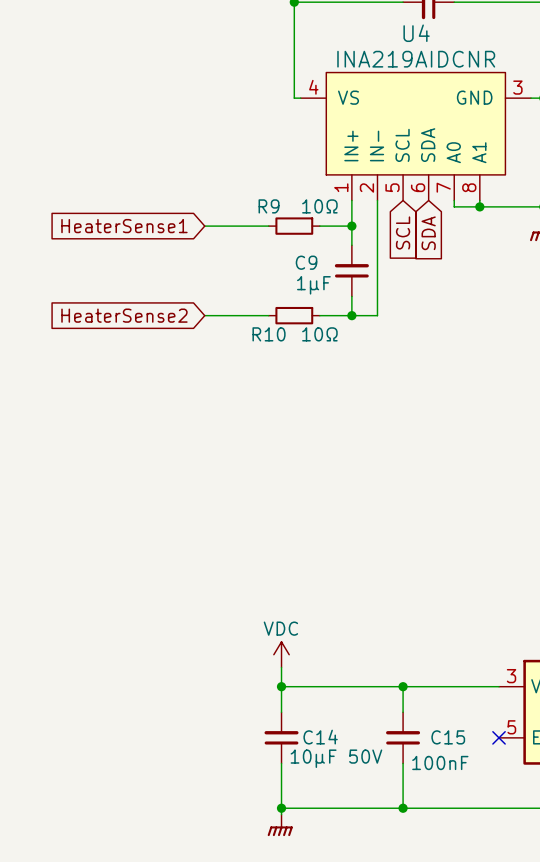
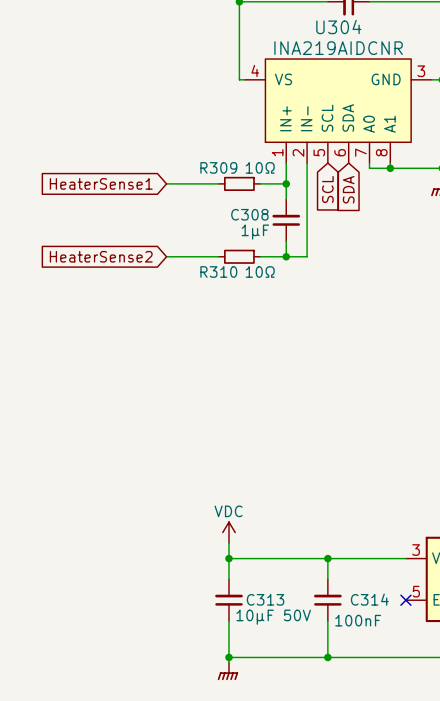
U4 name: U4 (416, 33) -> U304 (338, 27)
R9 name: R9 (269, 206) -> R309 (218, 167)
C9 name: C9 (306, 262) -> C308 (249, 214)
R10 name: R10 (269, 334) -> R310 (218, 271)
C14 name: C14 (320, 737) -> C313 (265, 599)
C15 name: C15 (448, 737) -> C314 (369, 599)

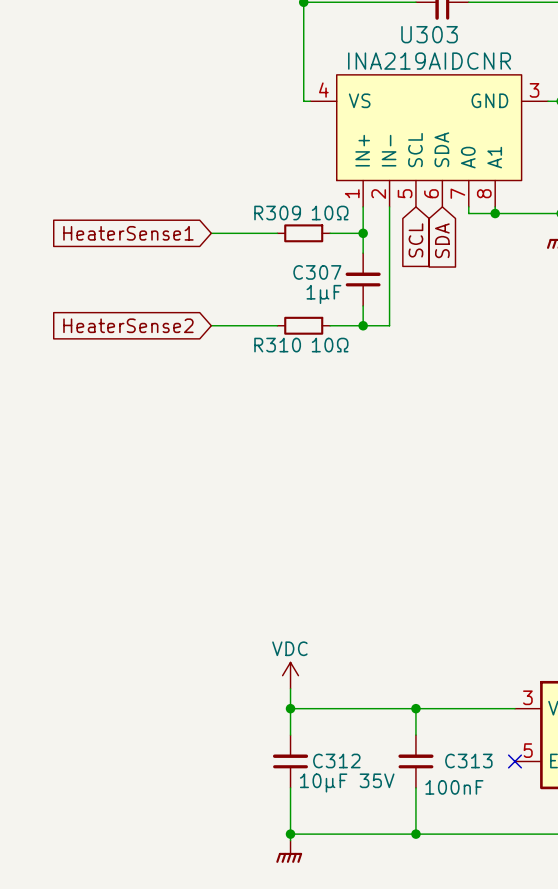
U304 name: U304 (338, 27) -> U303 (429, 34)
C308 name: C308 (249, 214) -> C307 (317, 272)
C313 name: C313 (265, 599) -> C312 (336, 760)
C314 name: C314 (369, 599) -> C313 (468, 760)
C313 value: 10µF 50V (273, 617) -> 10µF 35V (347, 783)

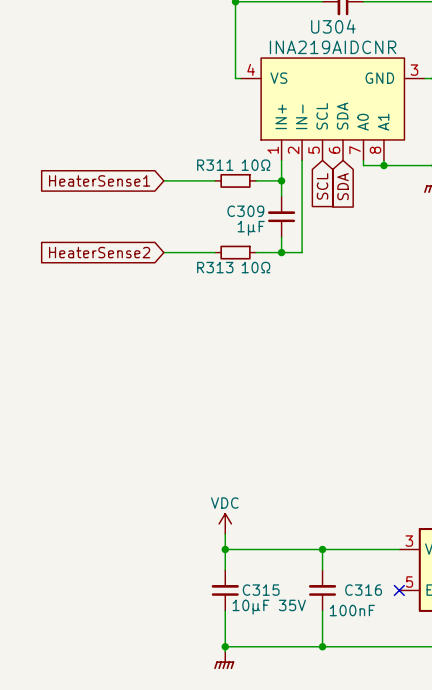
U303 name: U303 (429, 34) -> U304 (333, 26)
R309 name: R309 (277, 213) -> R311 (215, 165)
C307 name: C307 (317, 272) -> C309 (245, 211)
R310 name: R310 (277, 345) -> R313 (215, 267)
C312 name: C312 (336, 760) -> C315 (261, 590)
C313 name: C313 (468, 760) -> C316 (363, 590)

